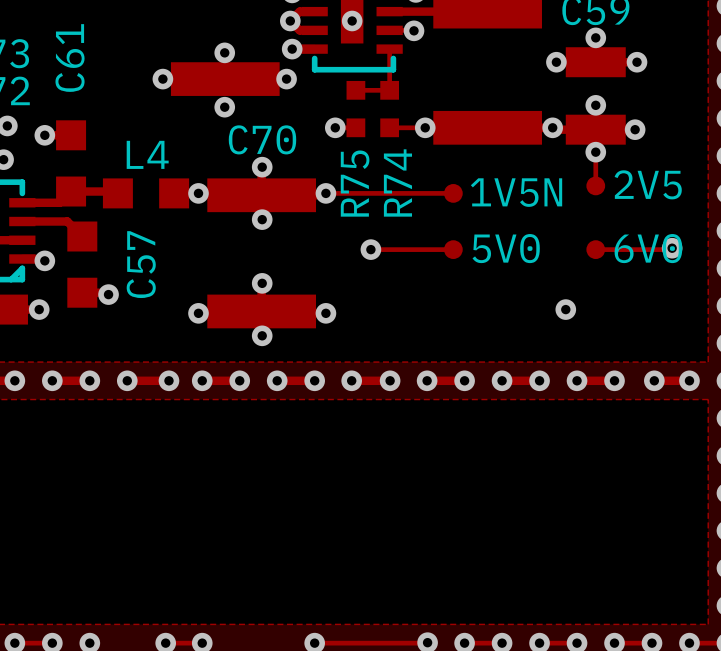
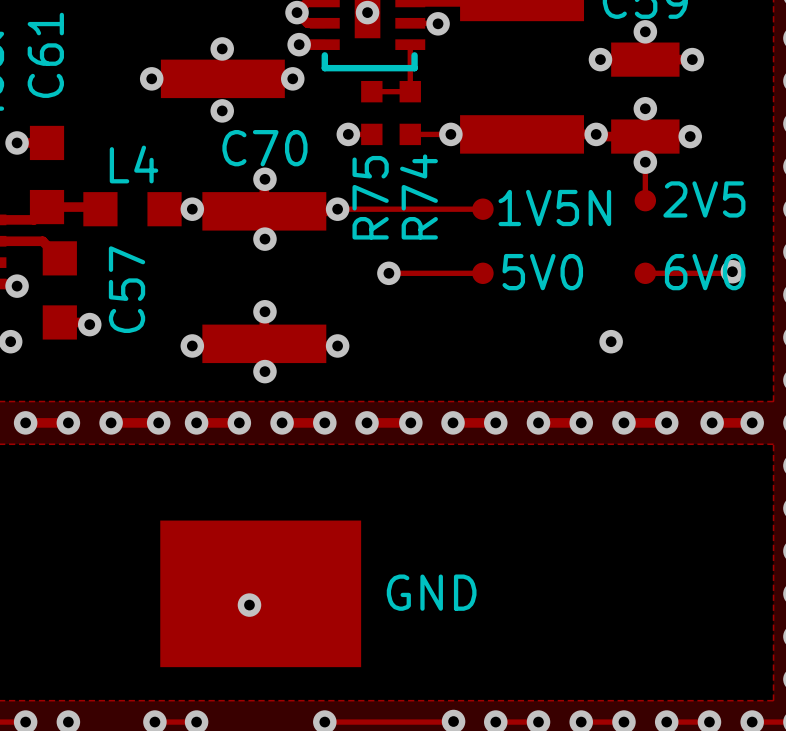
text: none -> GND (431, 592)
part: none -> (260, 593)
via: none -> (249, 605)

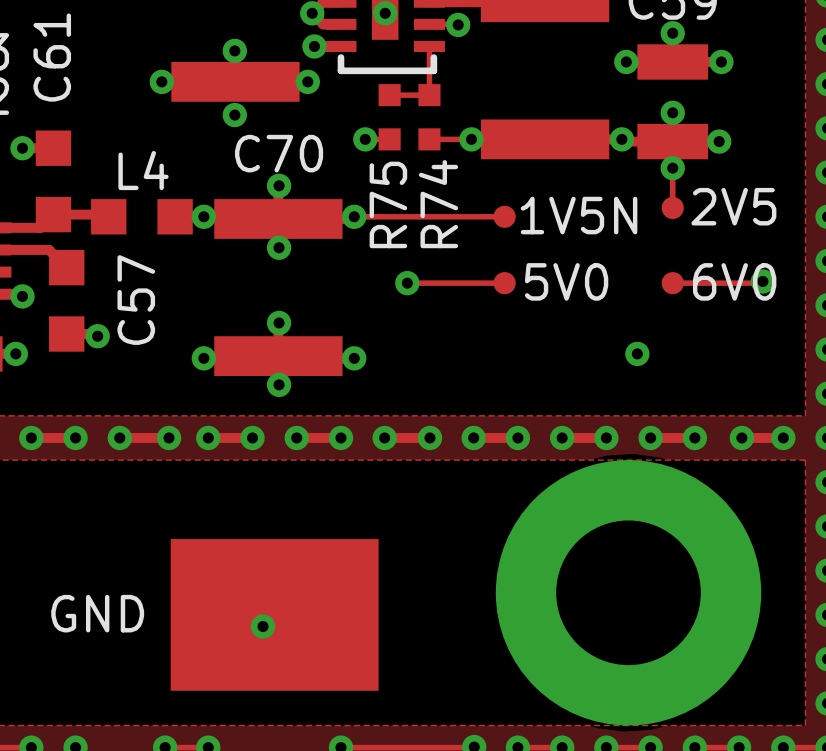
part: none -> (628, 592)
text position: GND (431, 592) -> GND (97, 613)

